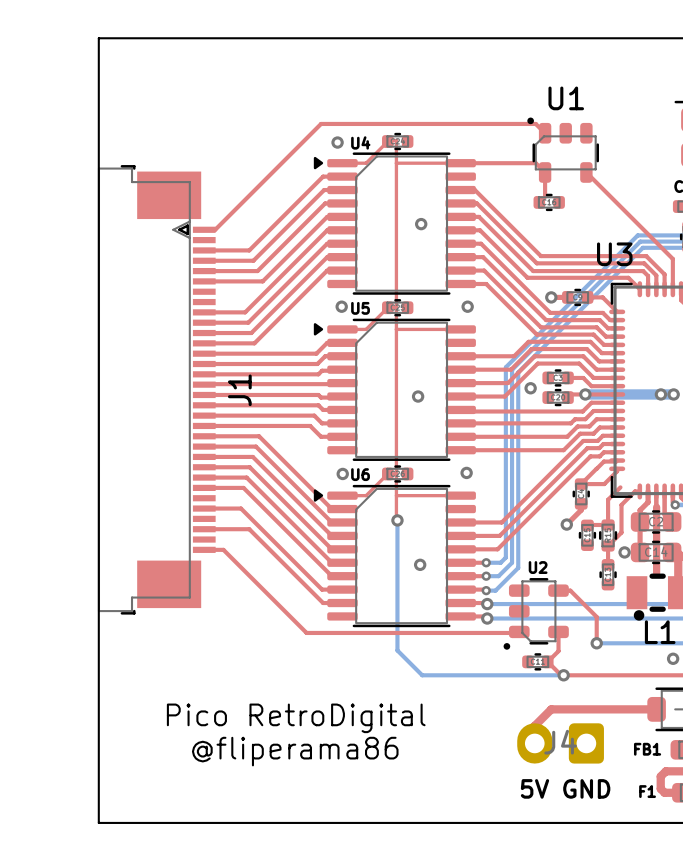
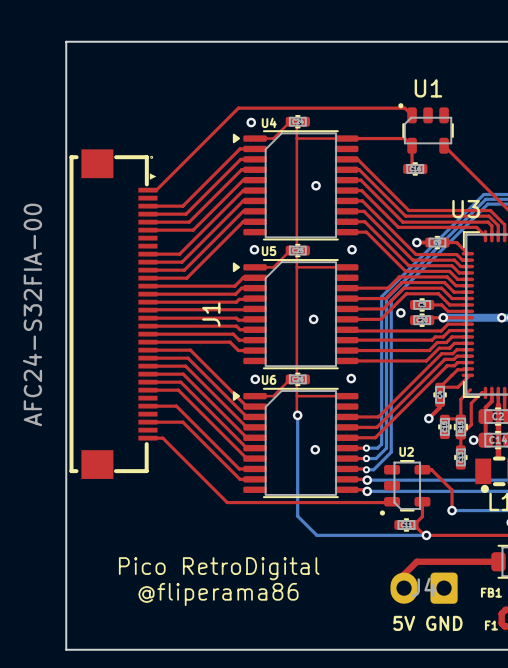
J1 footprint: [97, 165, 216, 615] -> [69, 149, 158, 479]
J1 value: none -> AFC24-S32FIA-00 (32, 314)
J1 name position: J1 (239, 390) -> J1 (211, 314)

